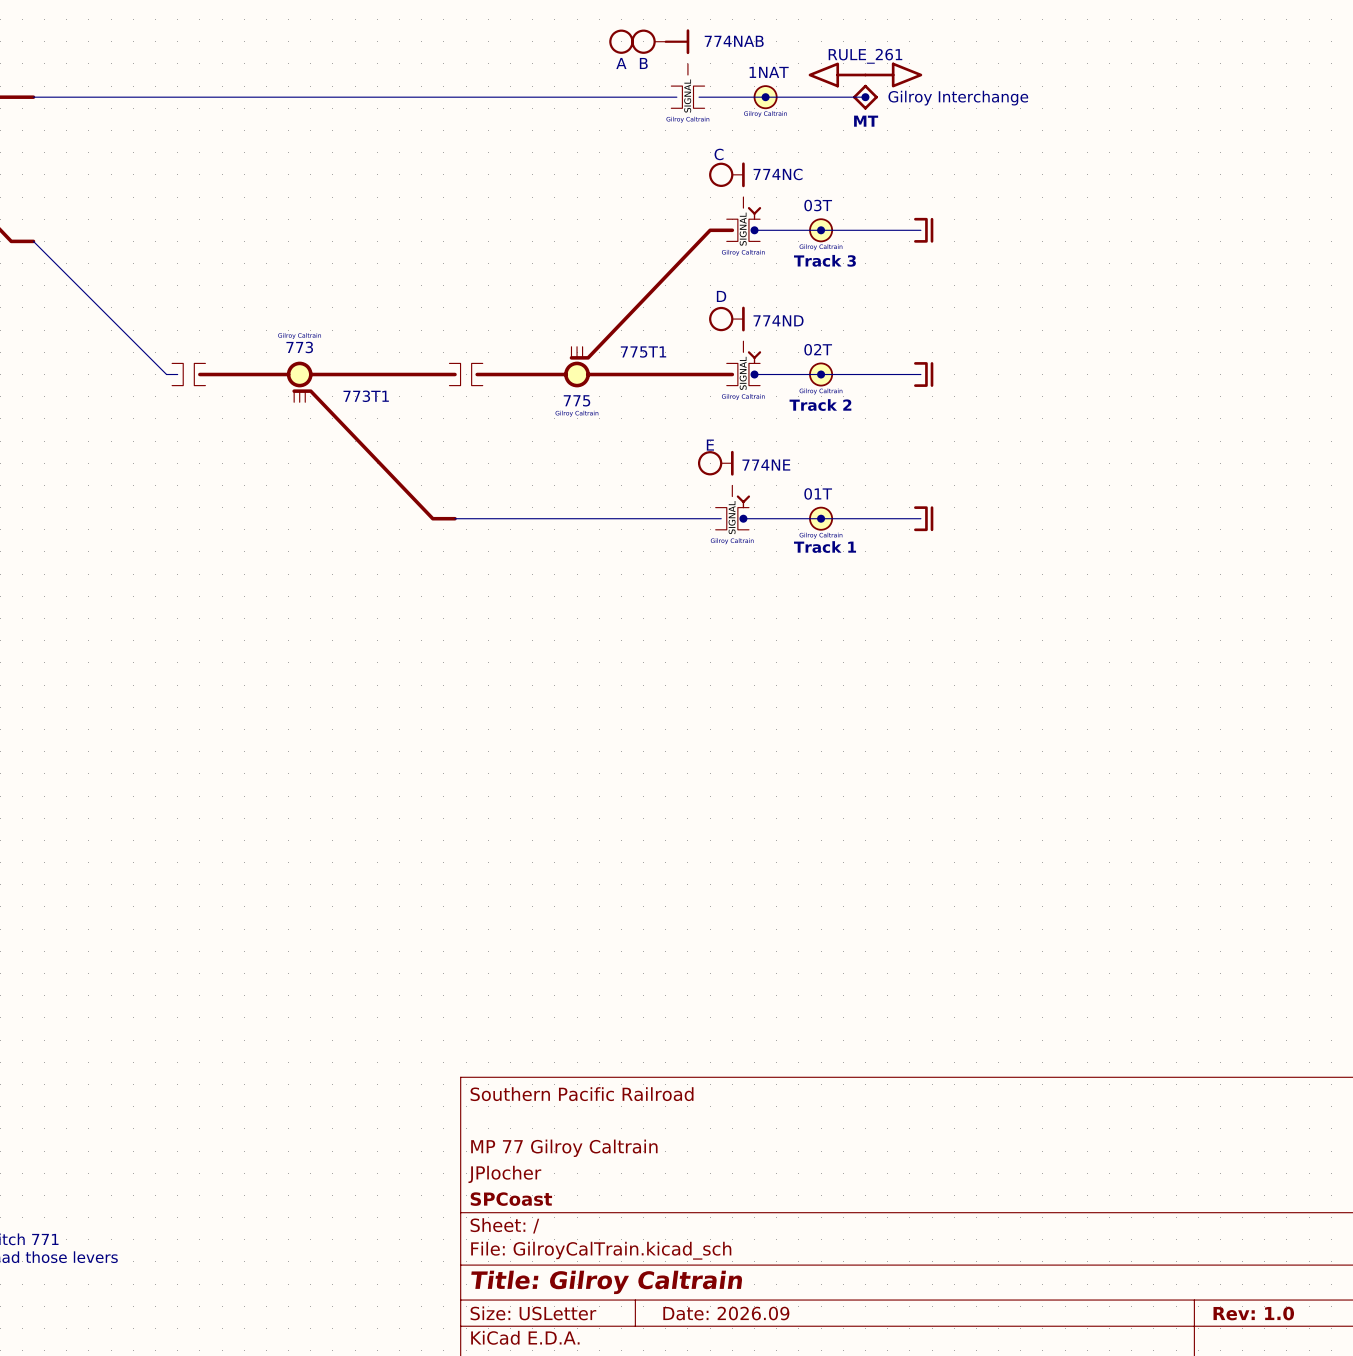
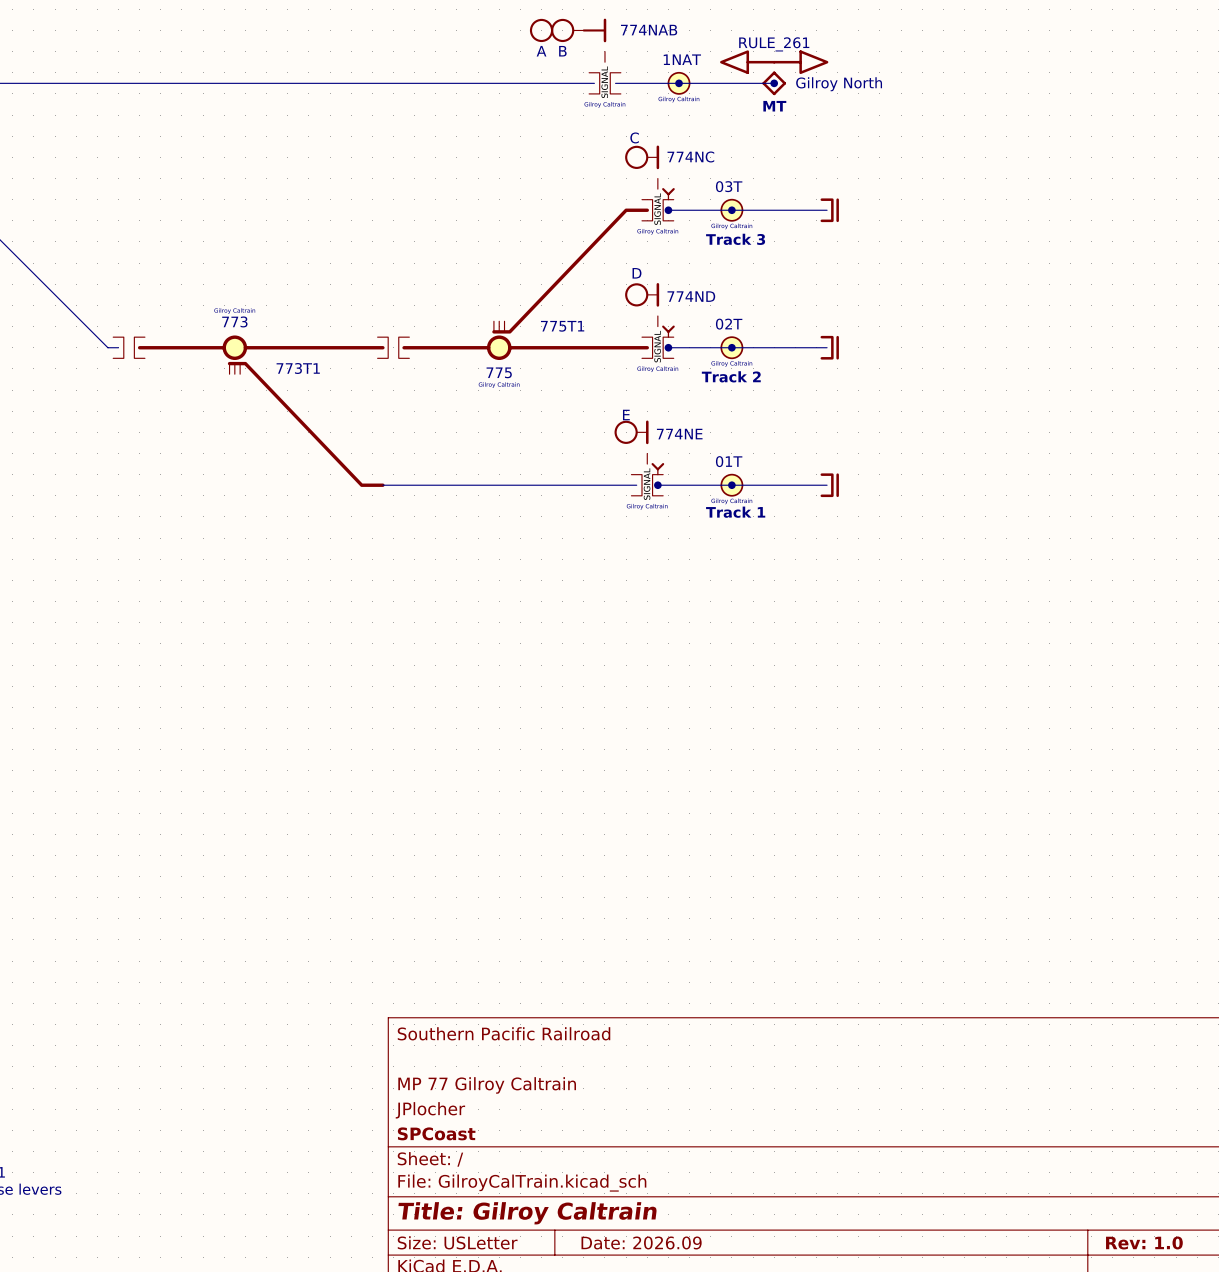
part value: Gilroy Interchange (958, 98) -> Gilroy North (839, 84)

